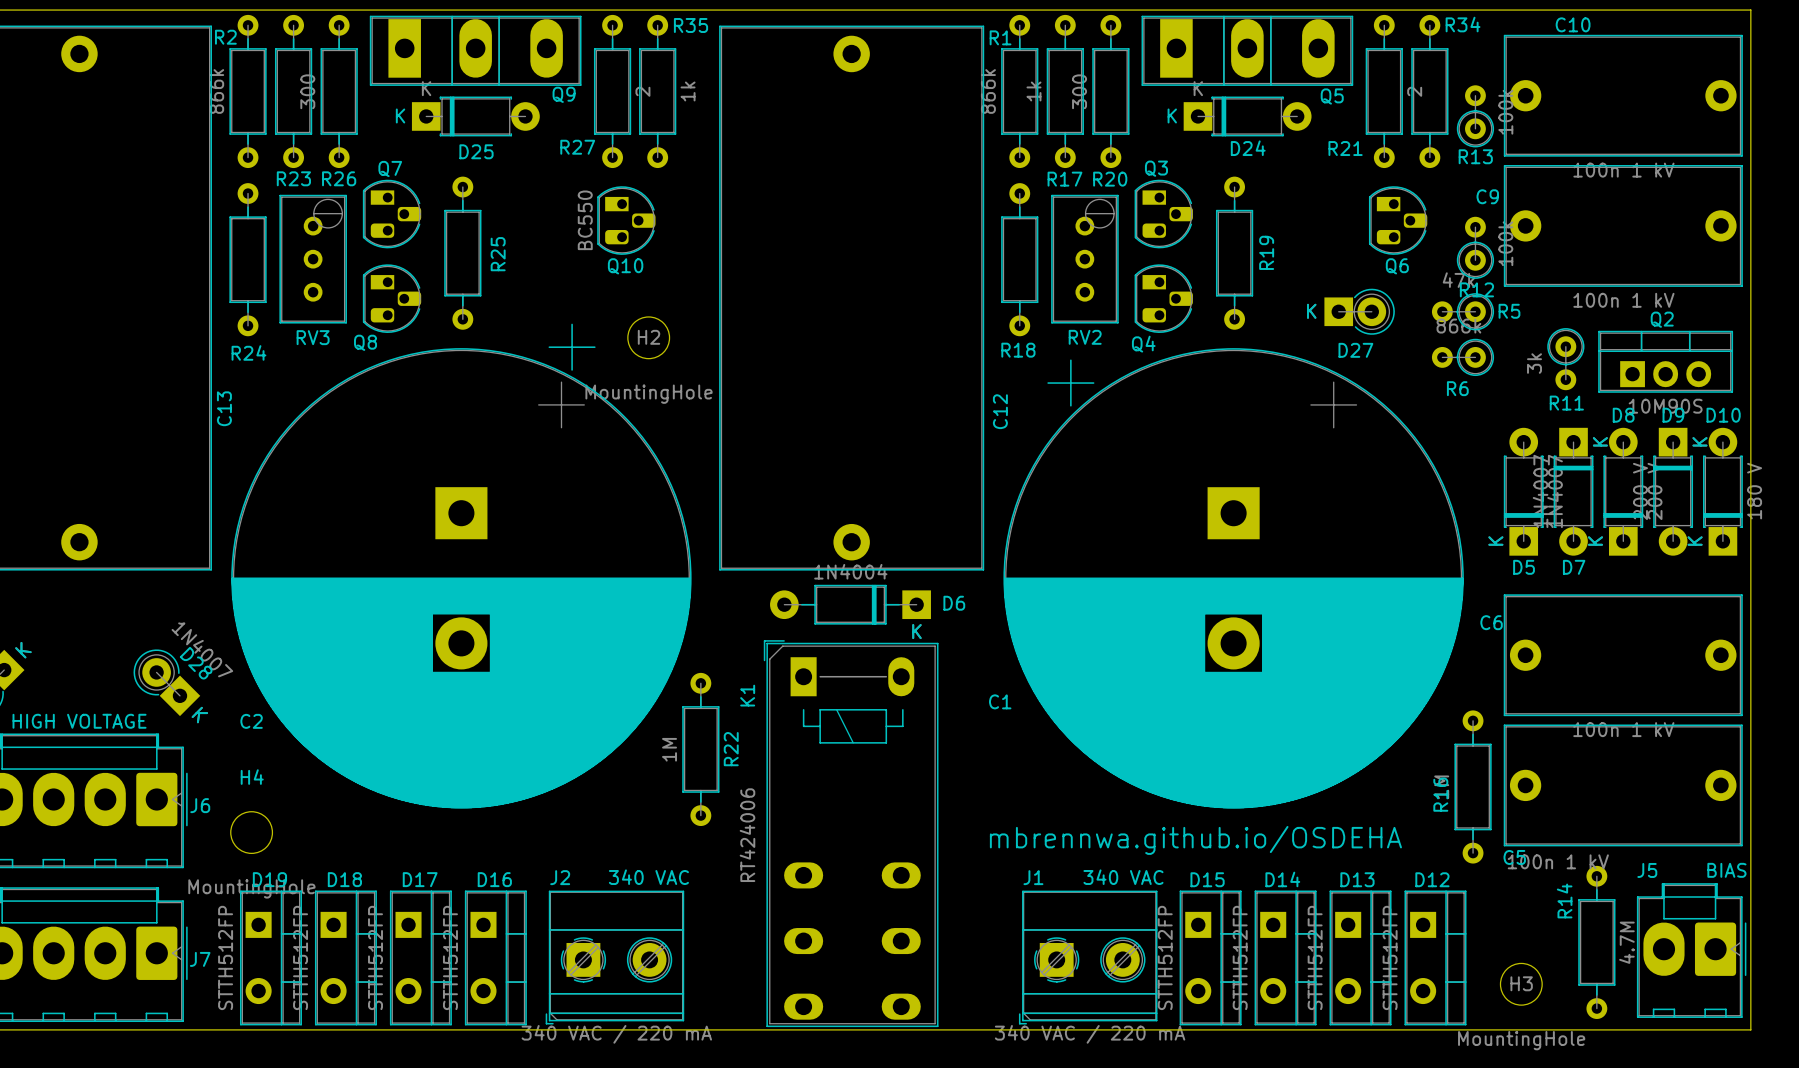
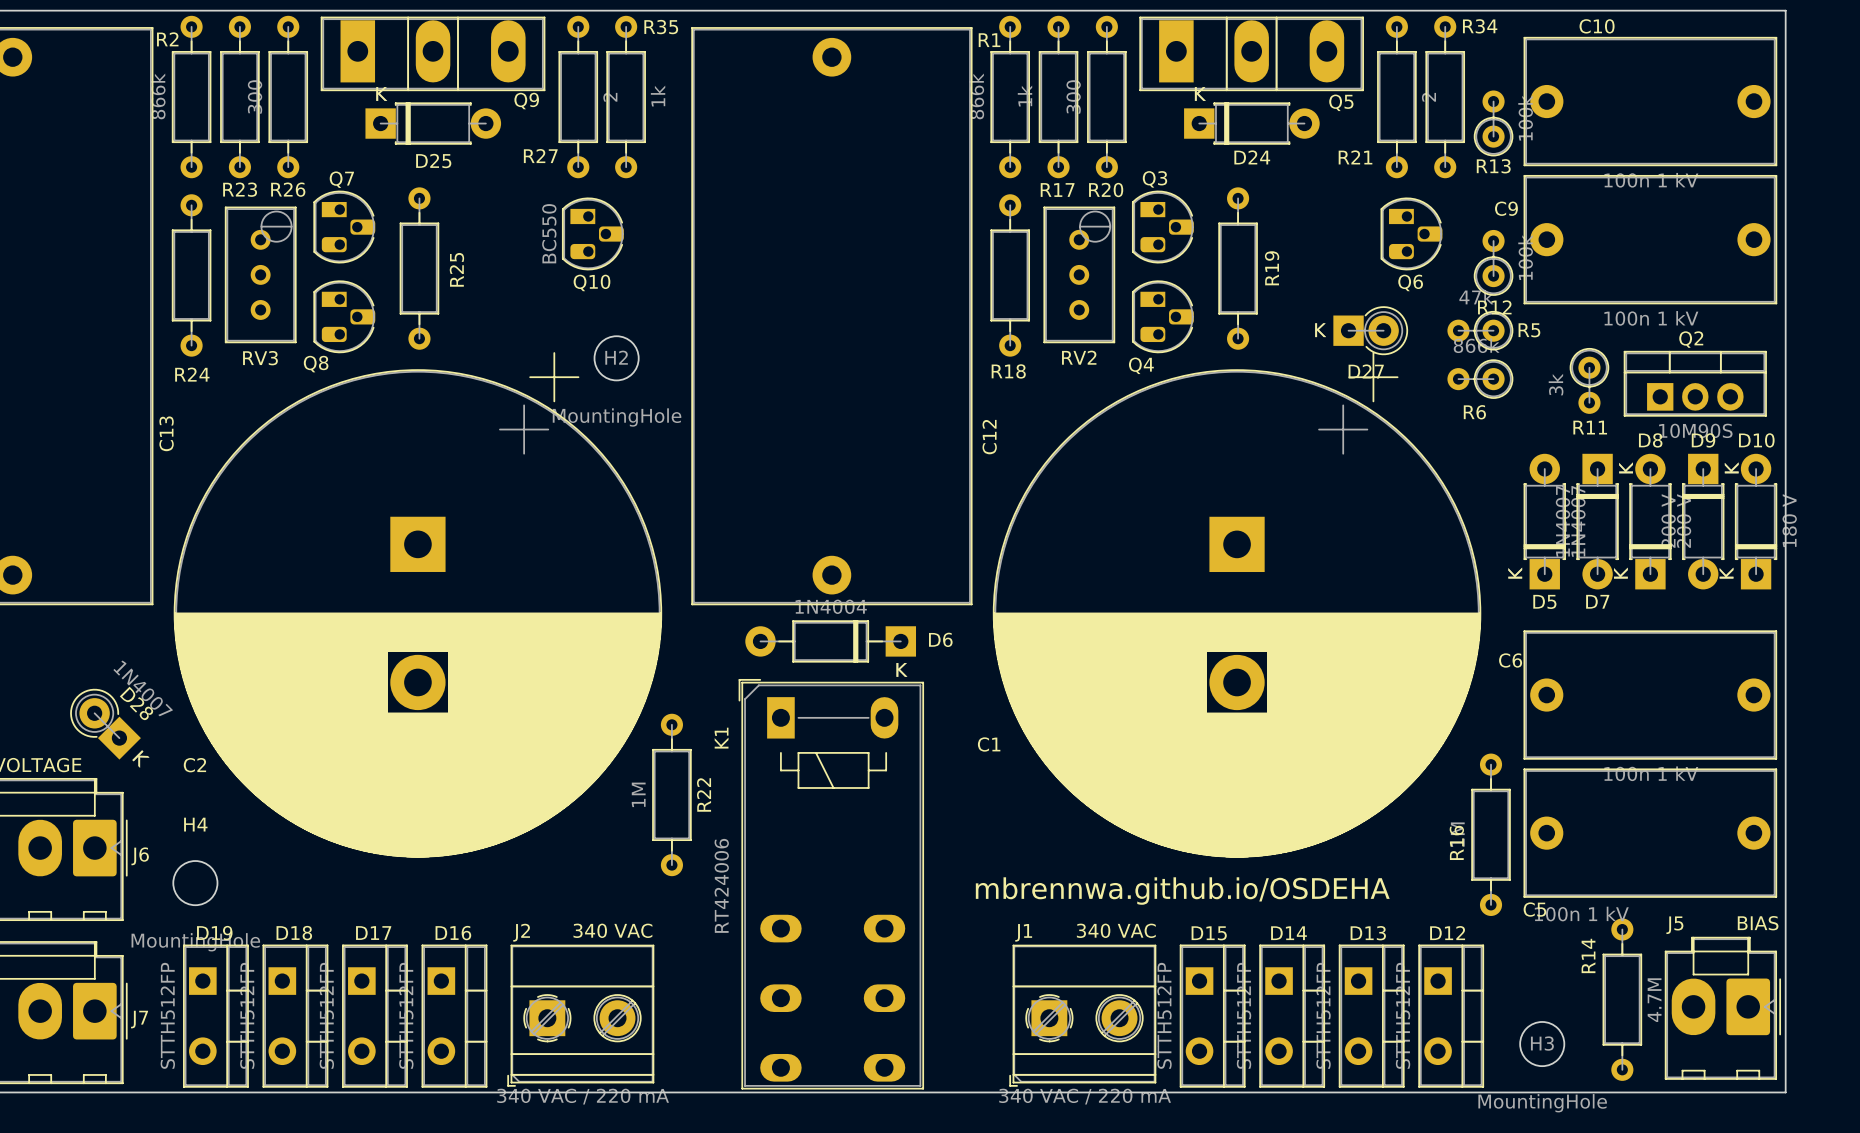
D25 footprint: [411, 96, 540, 137] -> [365, 102, 502, 145]
D24 footprint: [1183, 96, 1312, 137] -> [1184, 102, 1320, 145]
C2 footprint: [231, 323, 692, 809] -> [173, 352, 663, 858]
C1 footprint: [1003, 348, 1464, 809] -> [992, 352, 1482, 858]

